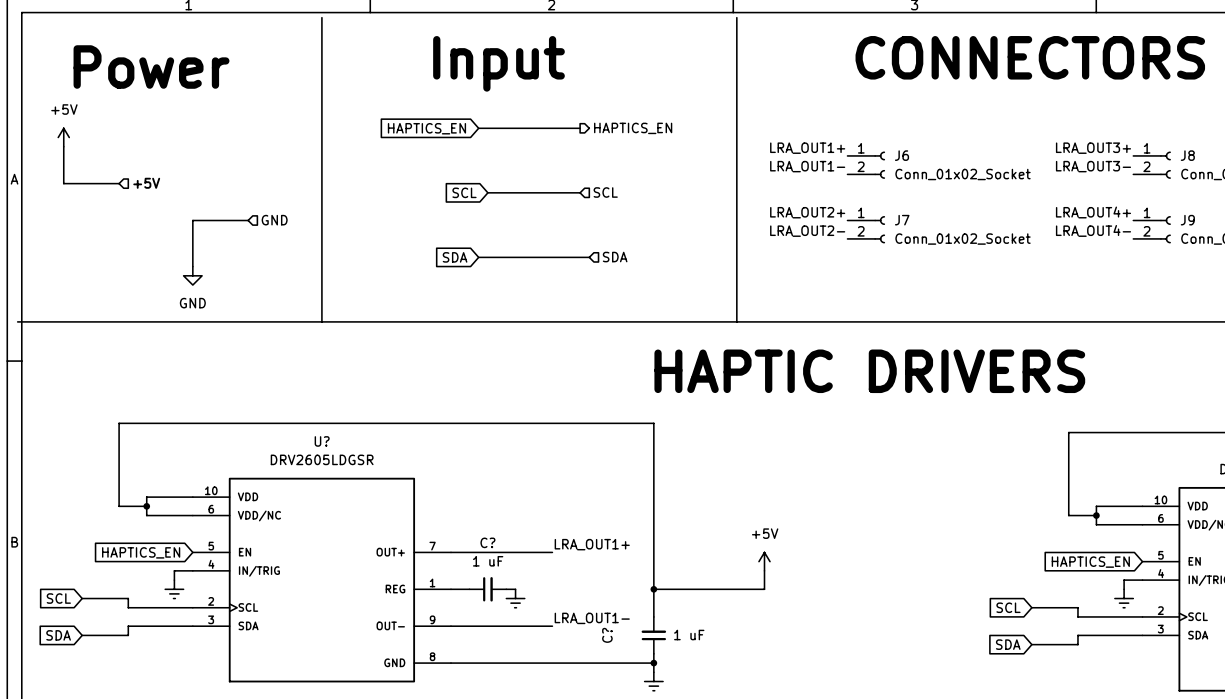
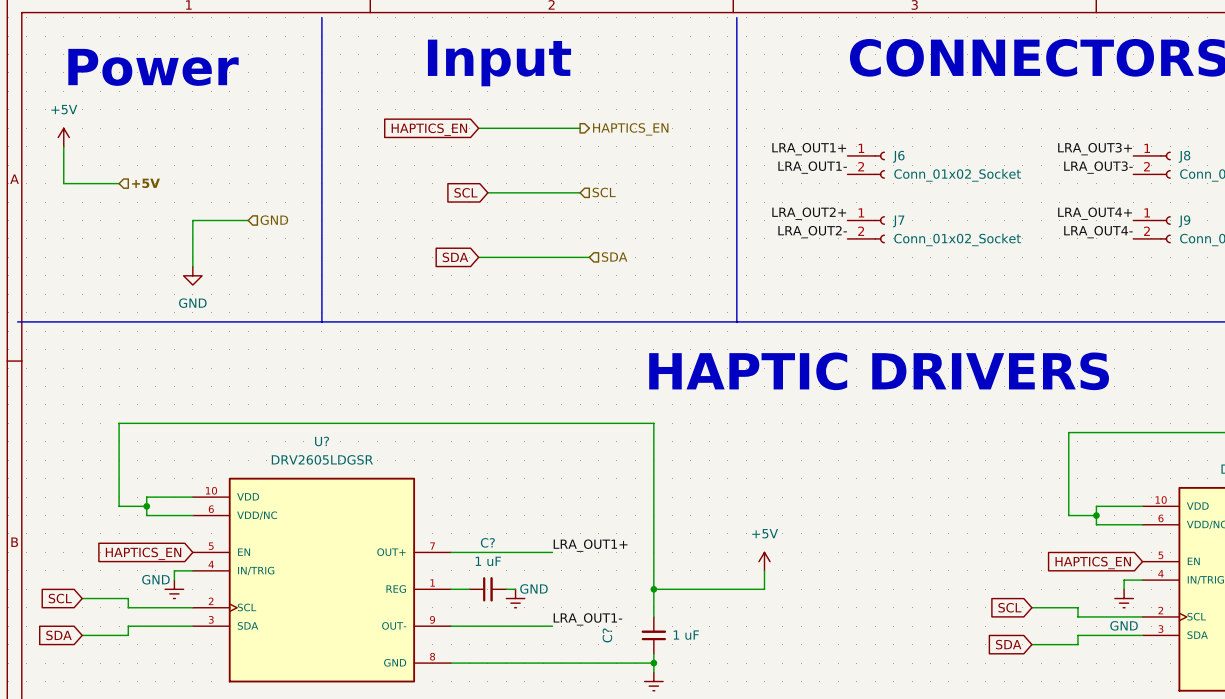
power symbol text: none -> GND (155, 579)
power symbol text: none -> GND (533, 588)
power symbol text: none -> GND (1124, 625)

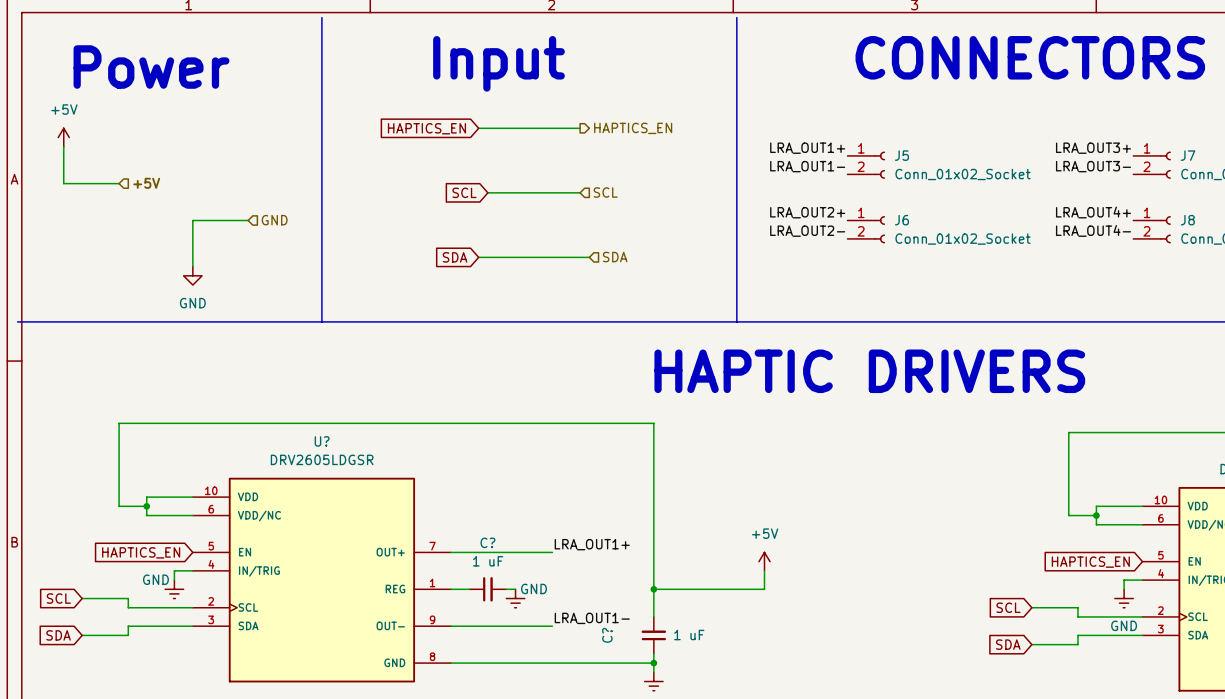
J6 name: J6 (898, 156) -> J5 (901, 155)
J8 name: J8 (1184, 156) -> J7 (1188, 155)
J7 name: J7 (898, 221) -> J6 (901, 220)
J9 name: J9 (1184, 221) -> J8 (1187, 220)

